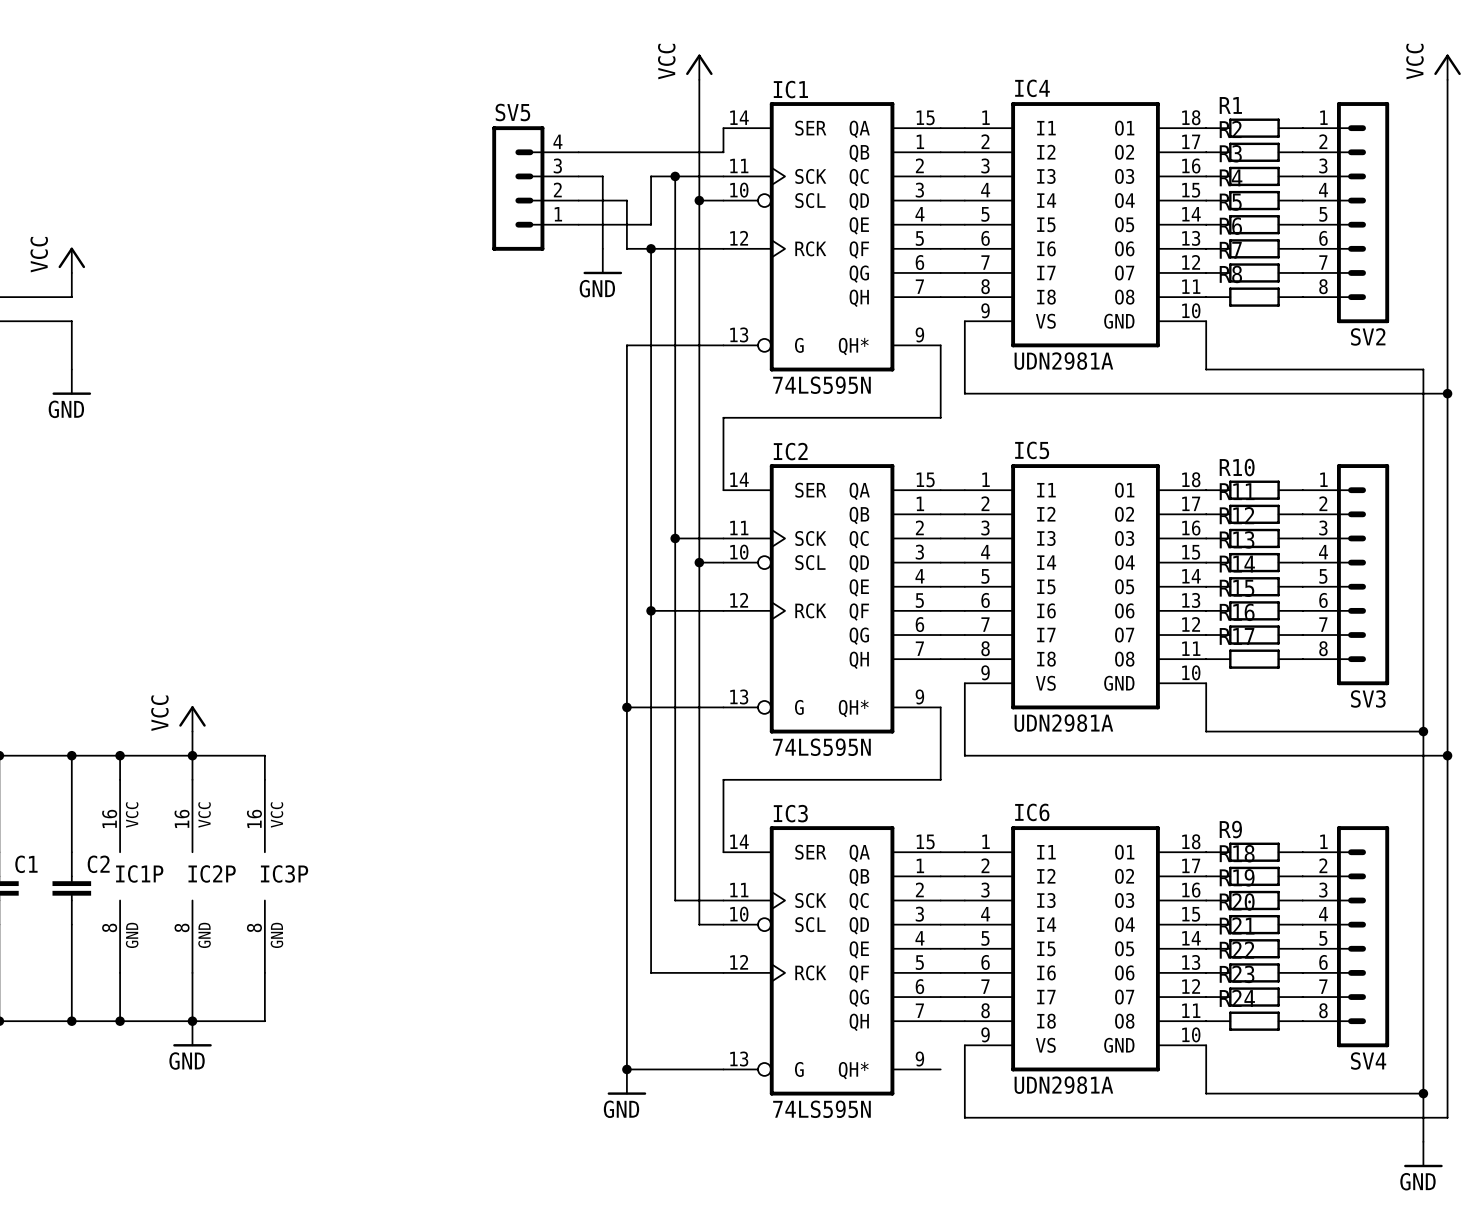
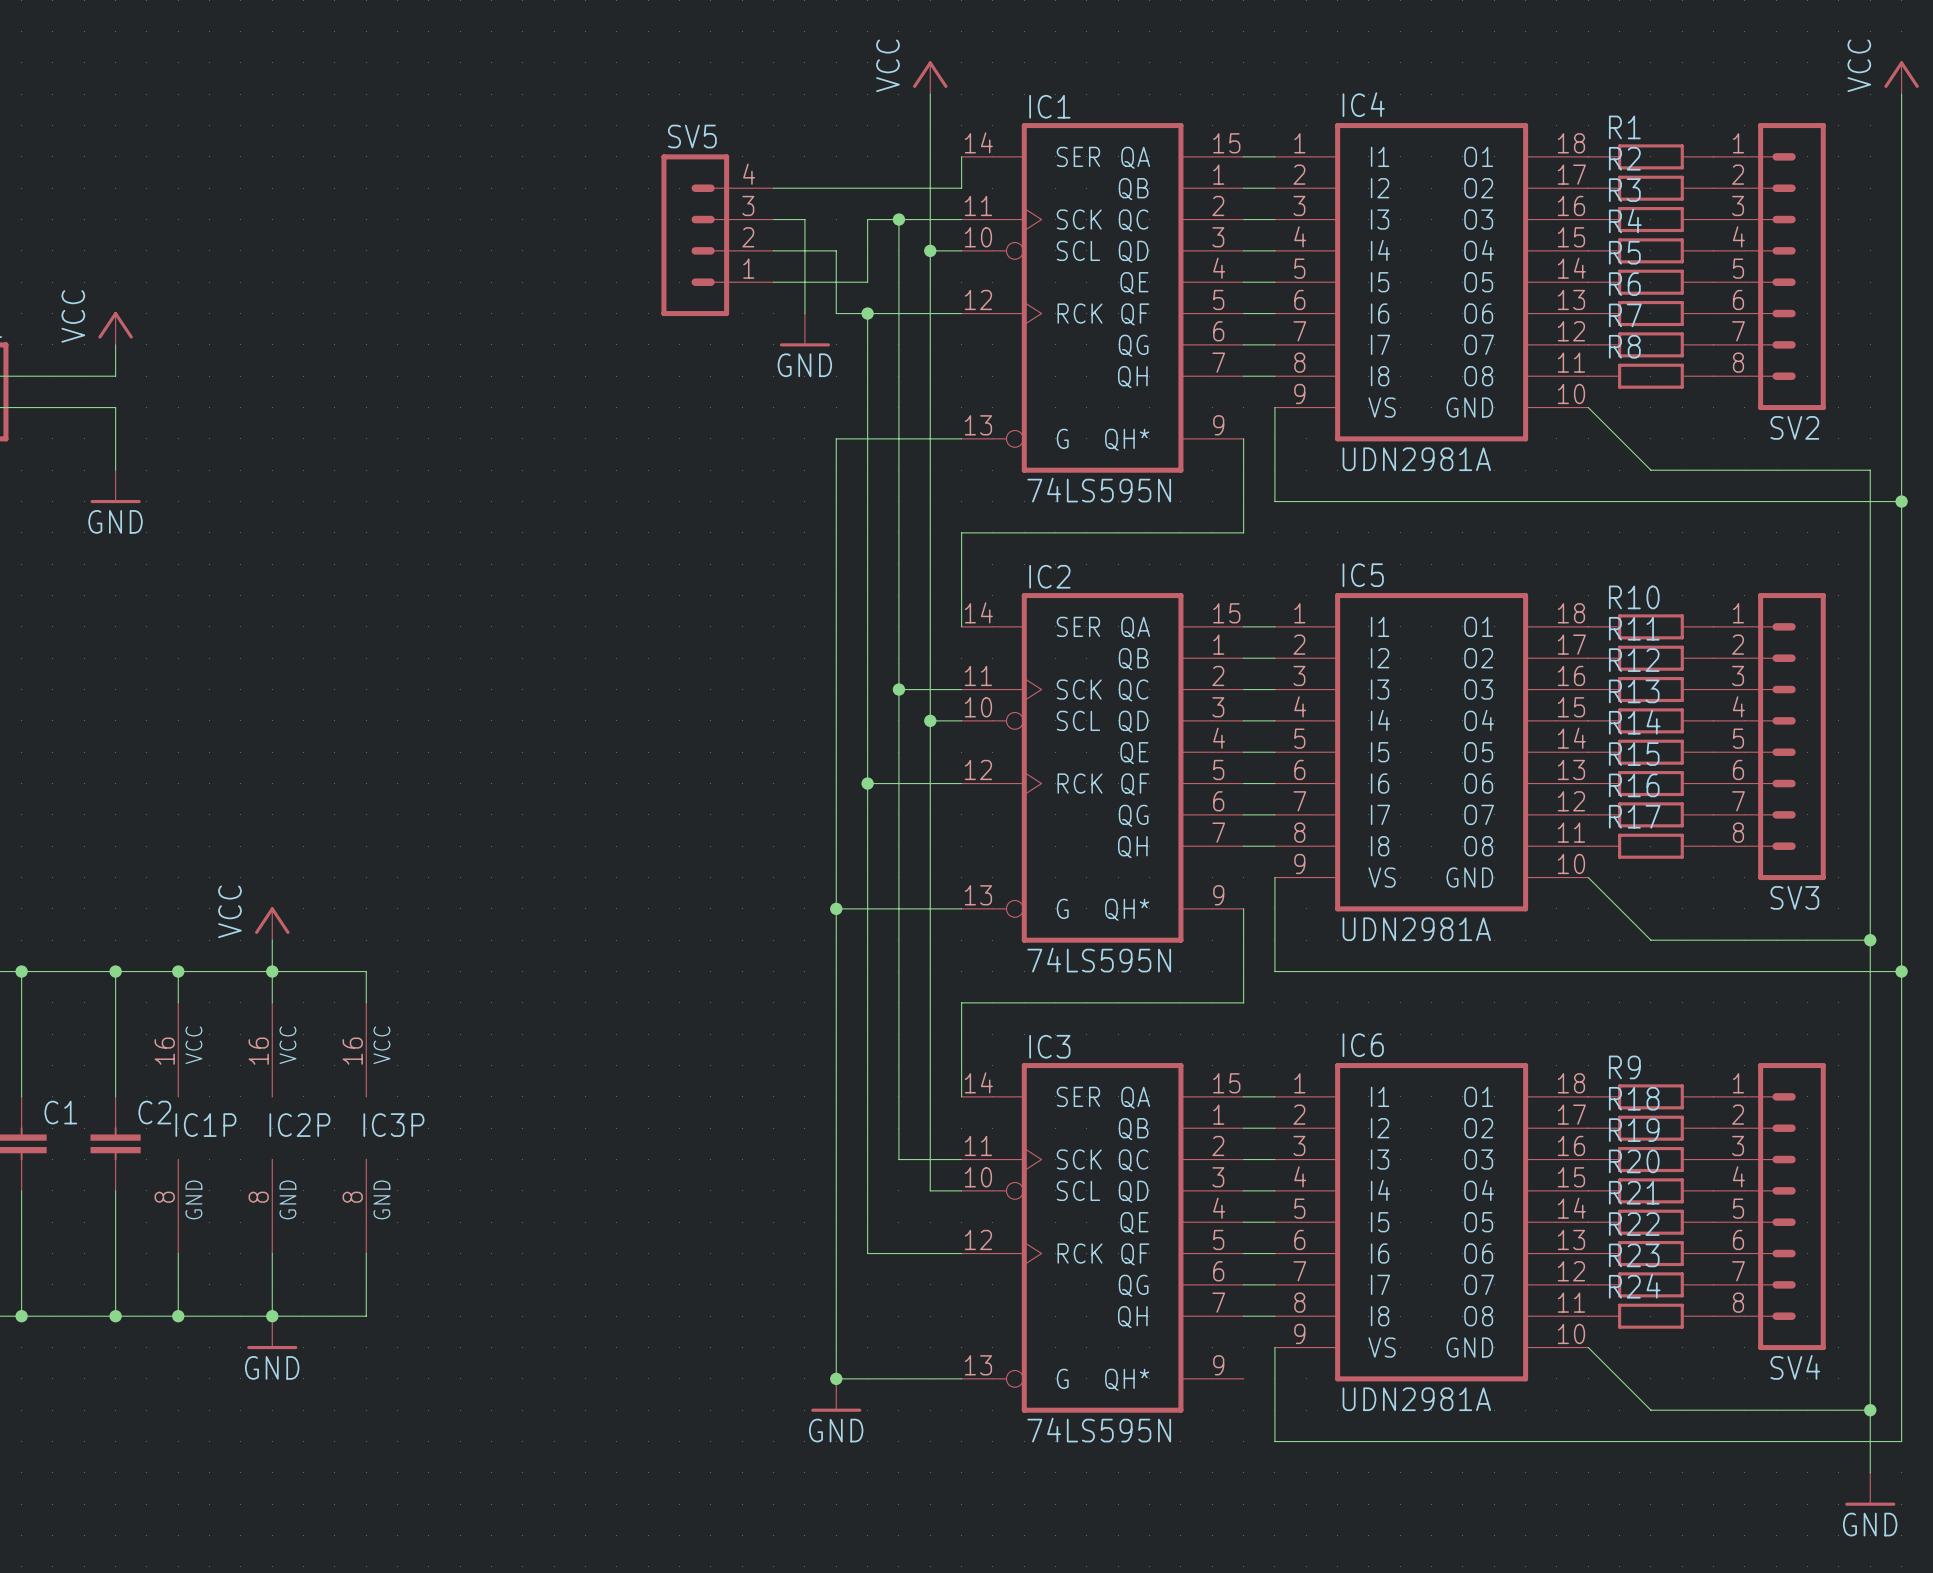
wire: (1206, 321) (1206, 369) (1254, 369) -> (1588, 407) (1650, 470)
wire: (1206, 683) (1206, 731) (1254, 731) -> (1588, 877) (1650, 940)
wire: (1206, 1045) (1206, 1093) (1254, 1093) -> (1588, 1347) (1650, 1410)

